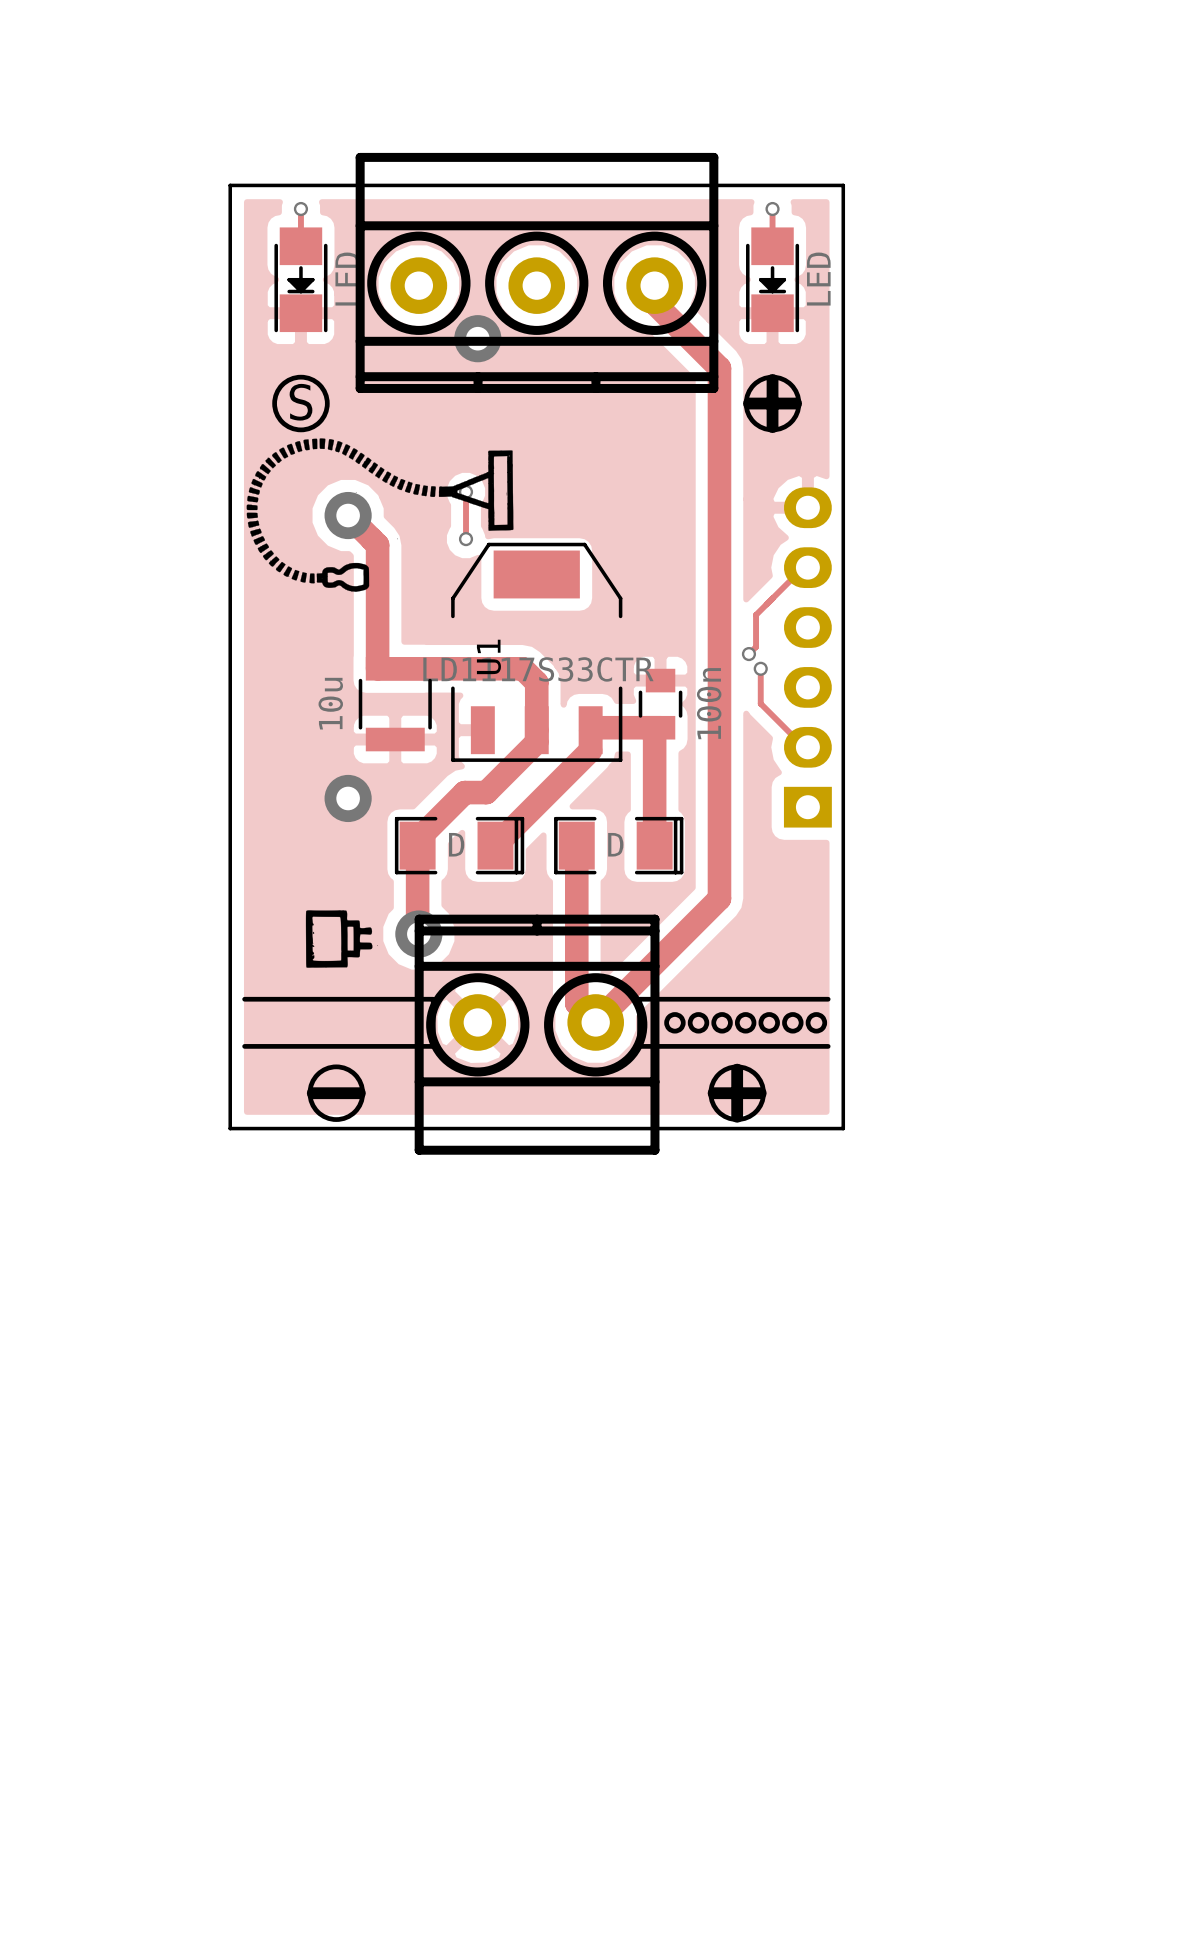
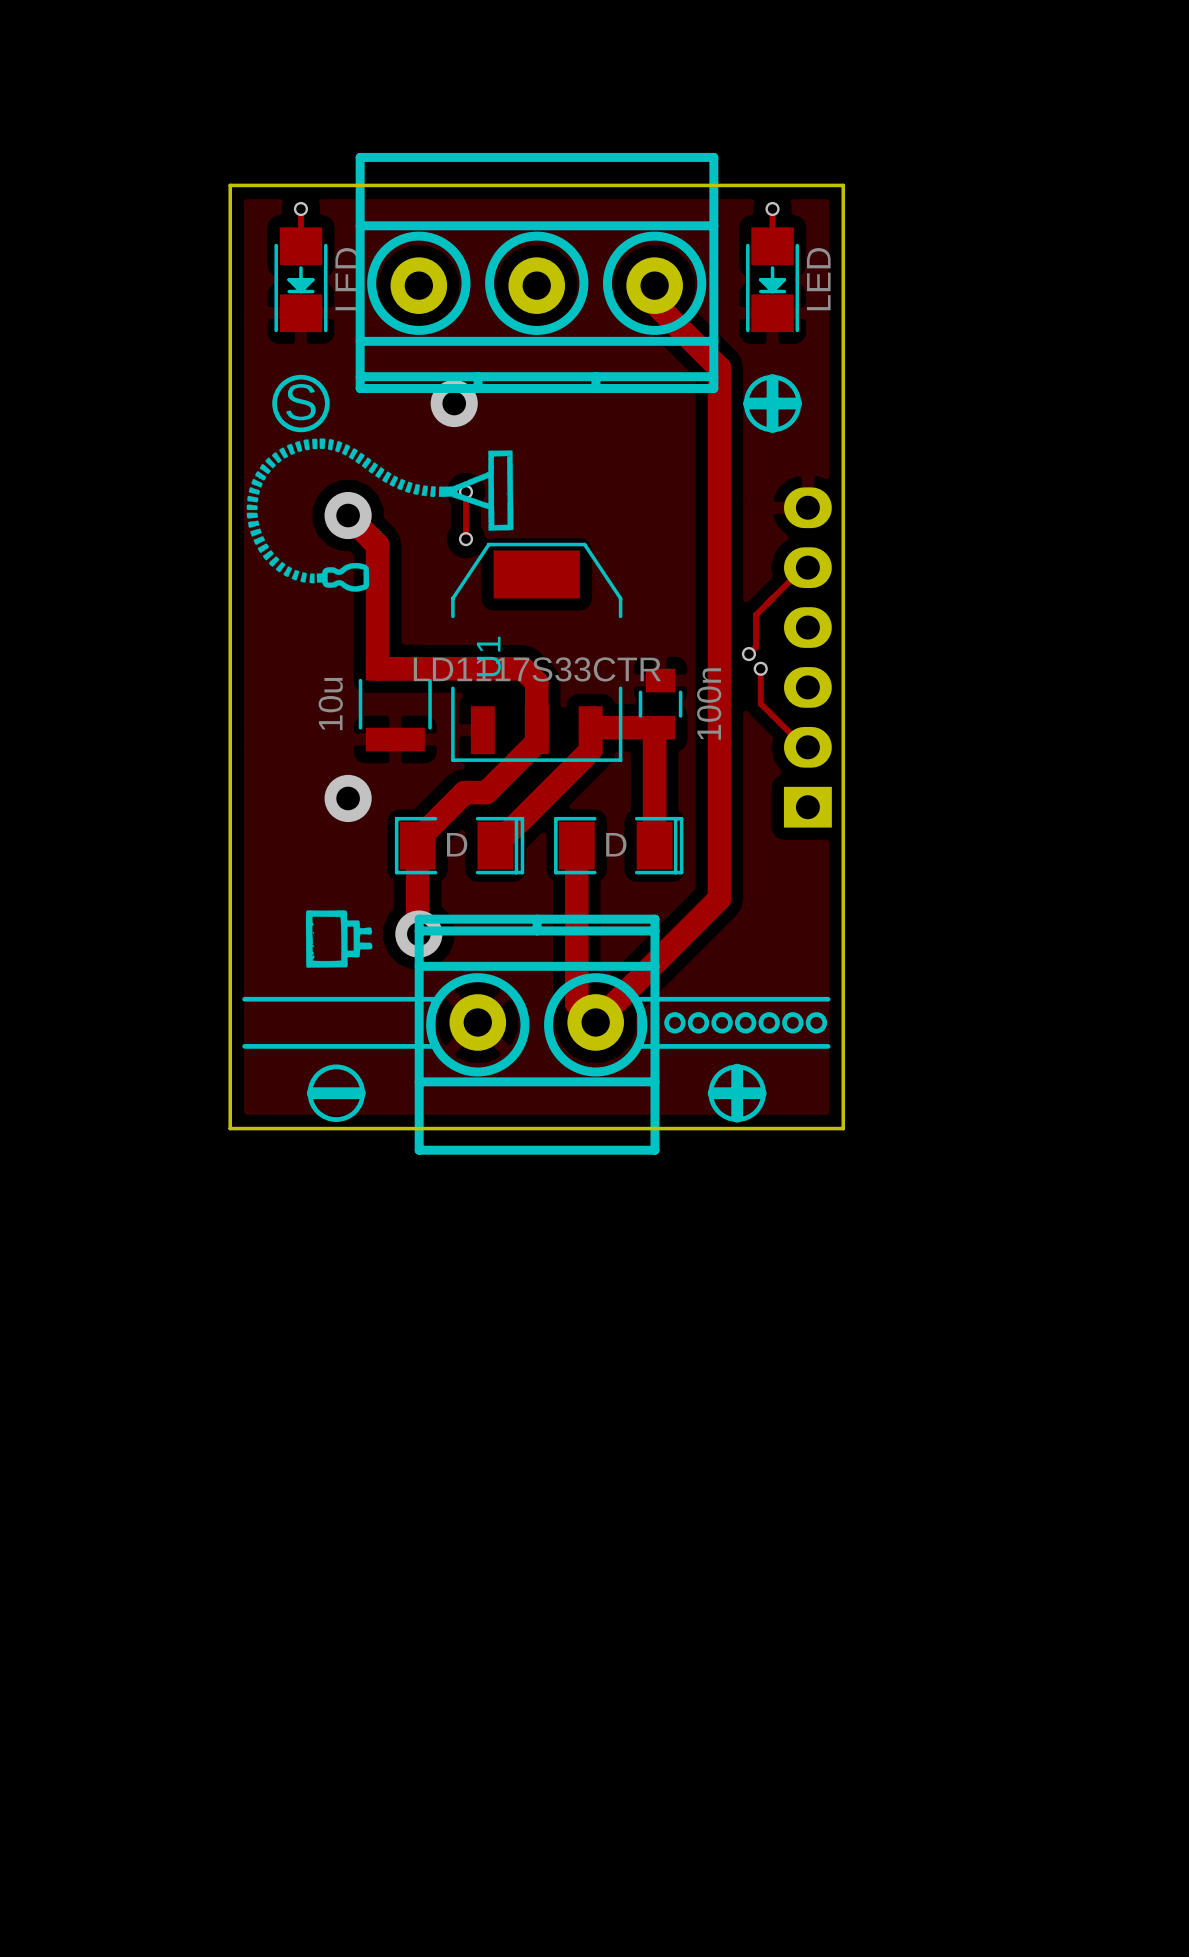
via position: (477, 338) -> (454, 403)

